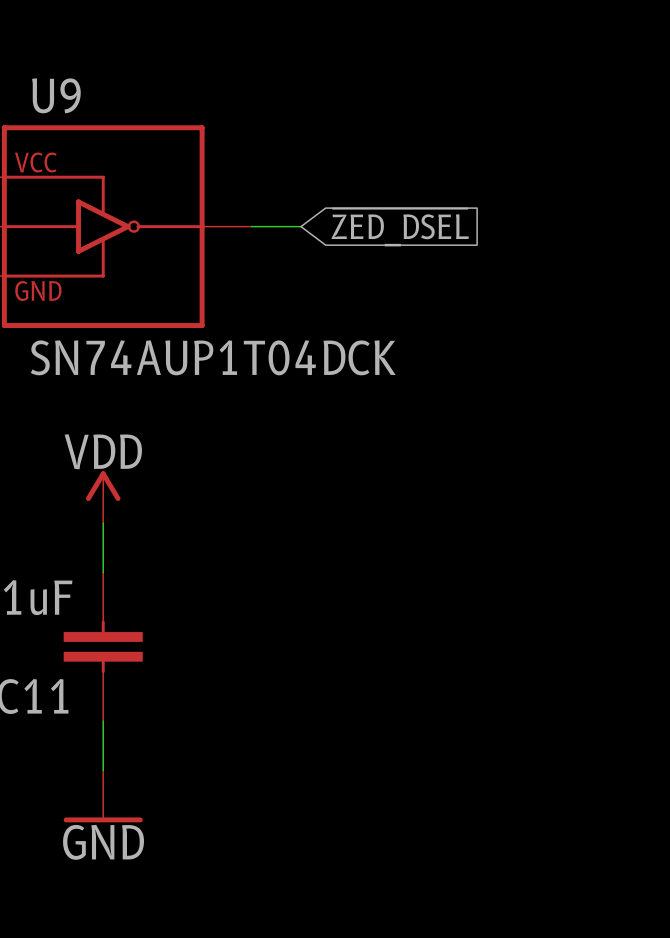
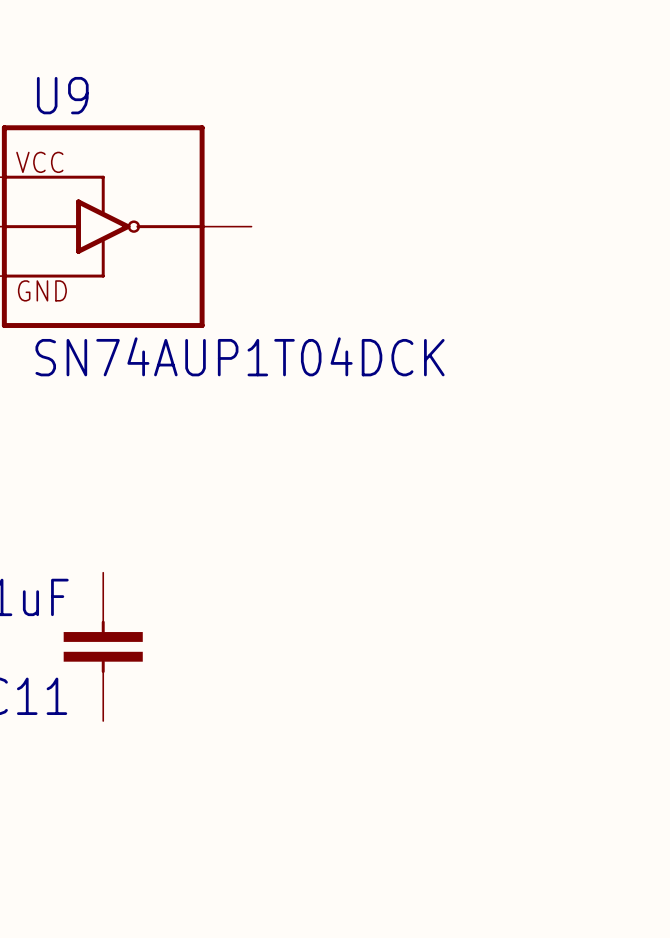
wire: (251, 226) (300, 226) -> none
global label: ~{ZED_DSEL} (400, 227) -> none
power symbol: VDD (103, 497) -> none
wire: (103, 523) (103, 572) -> none
wire: (103, 721) (103, 770) -> none
power symbol: GND (103, 796) -> none

